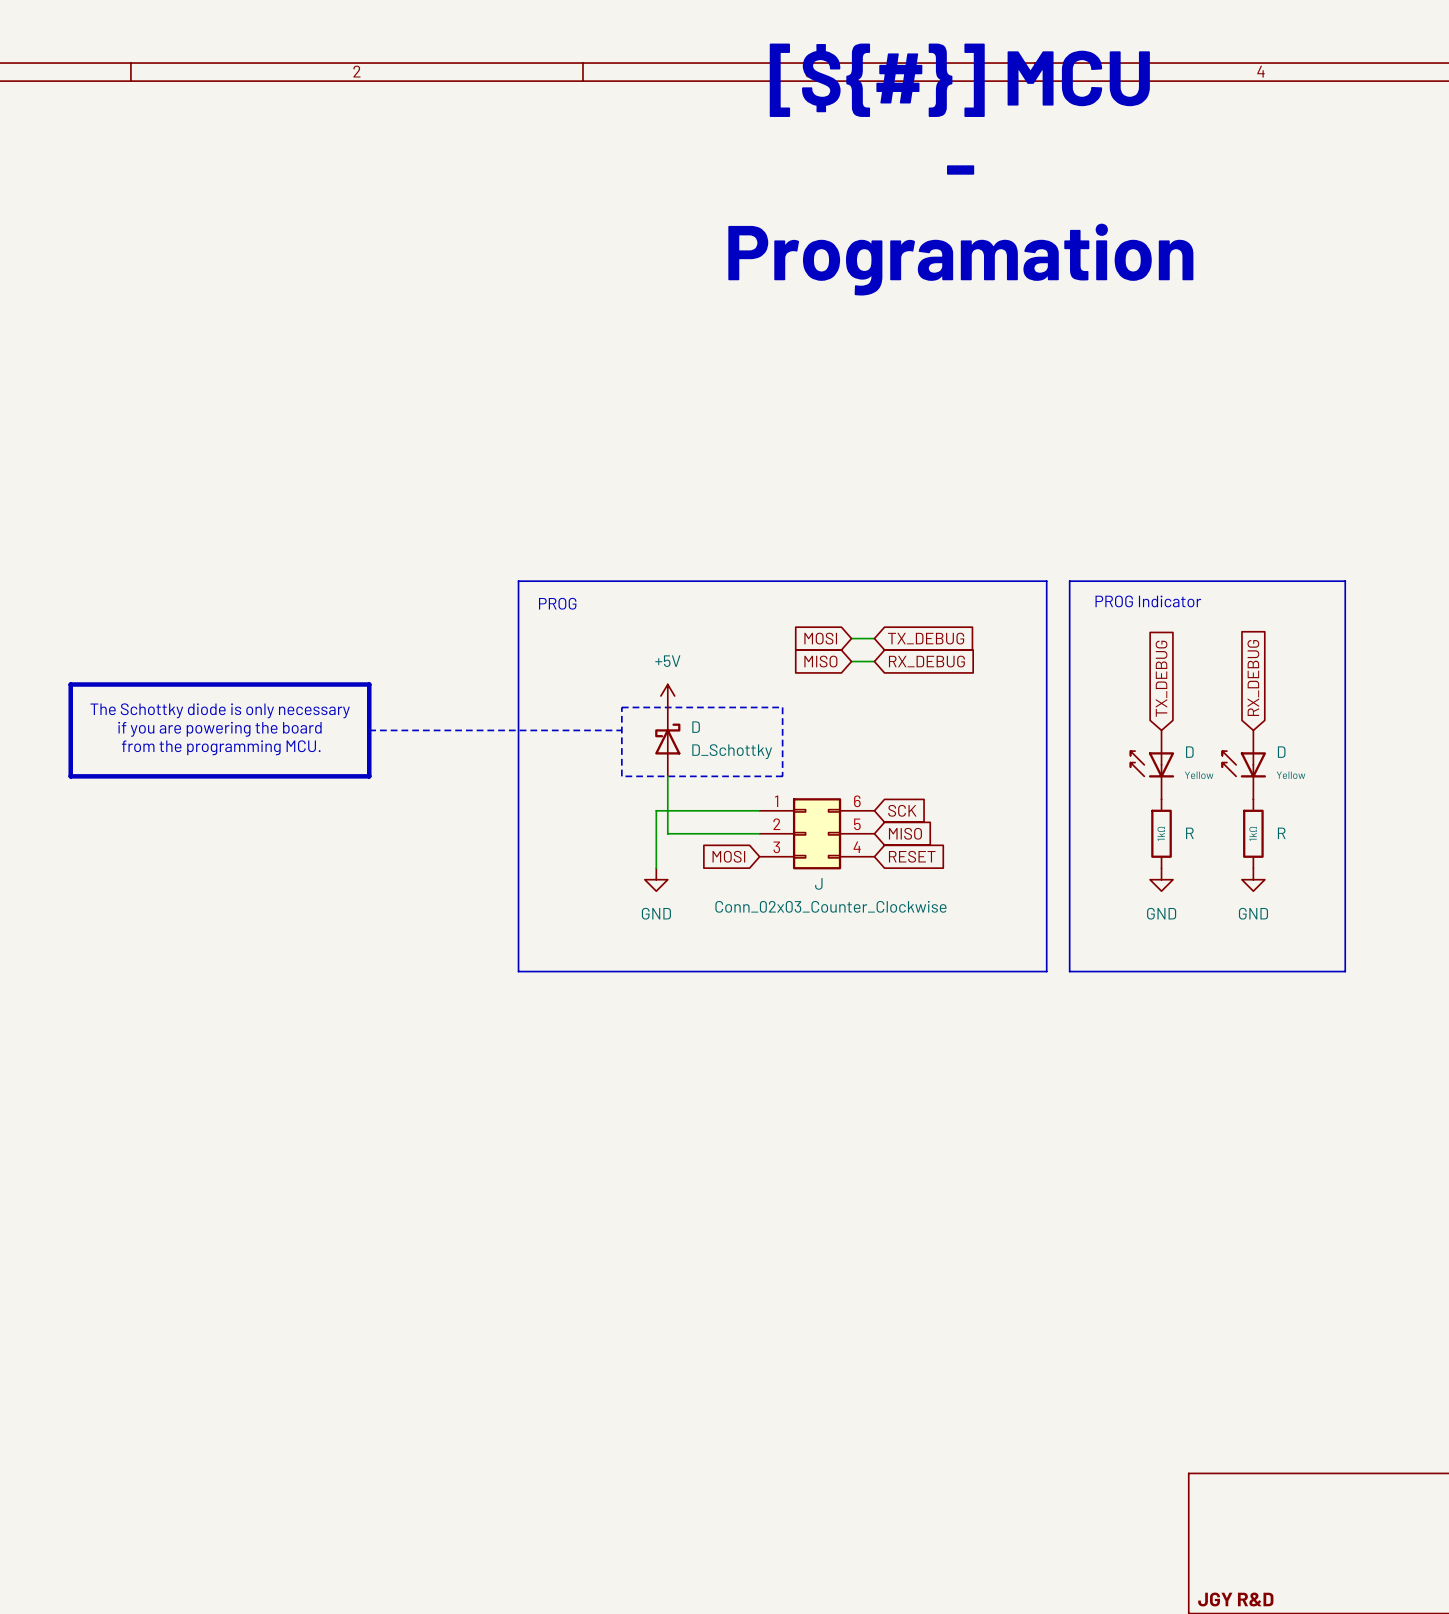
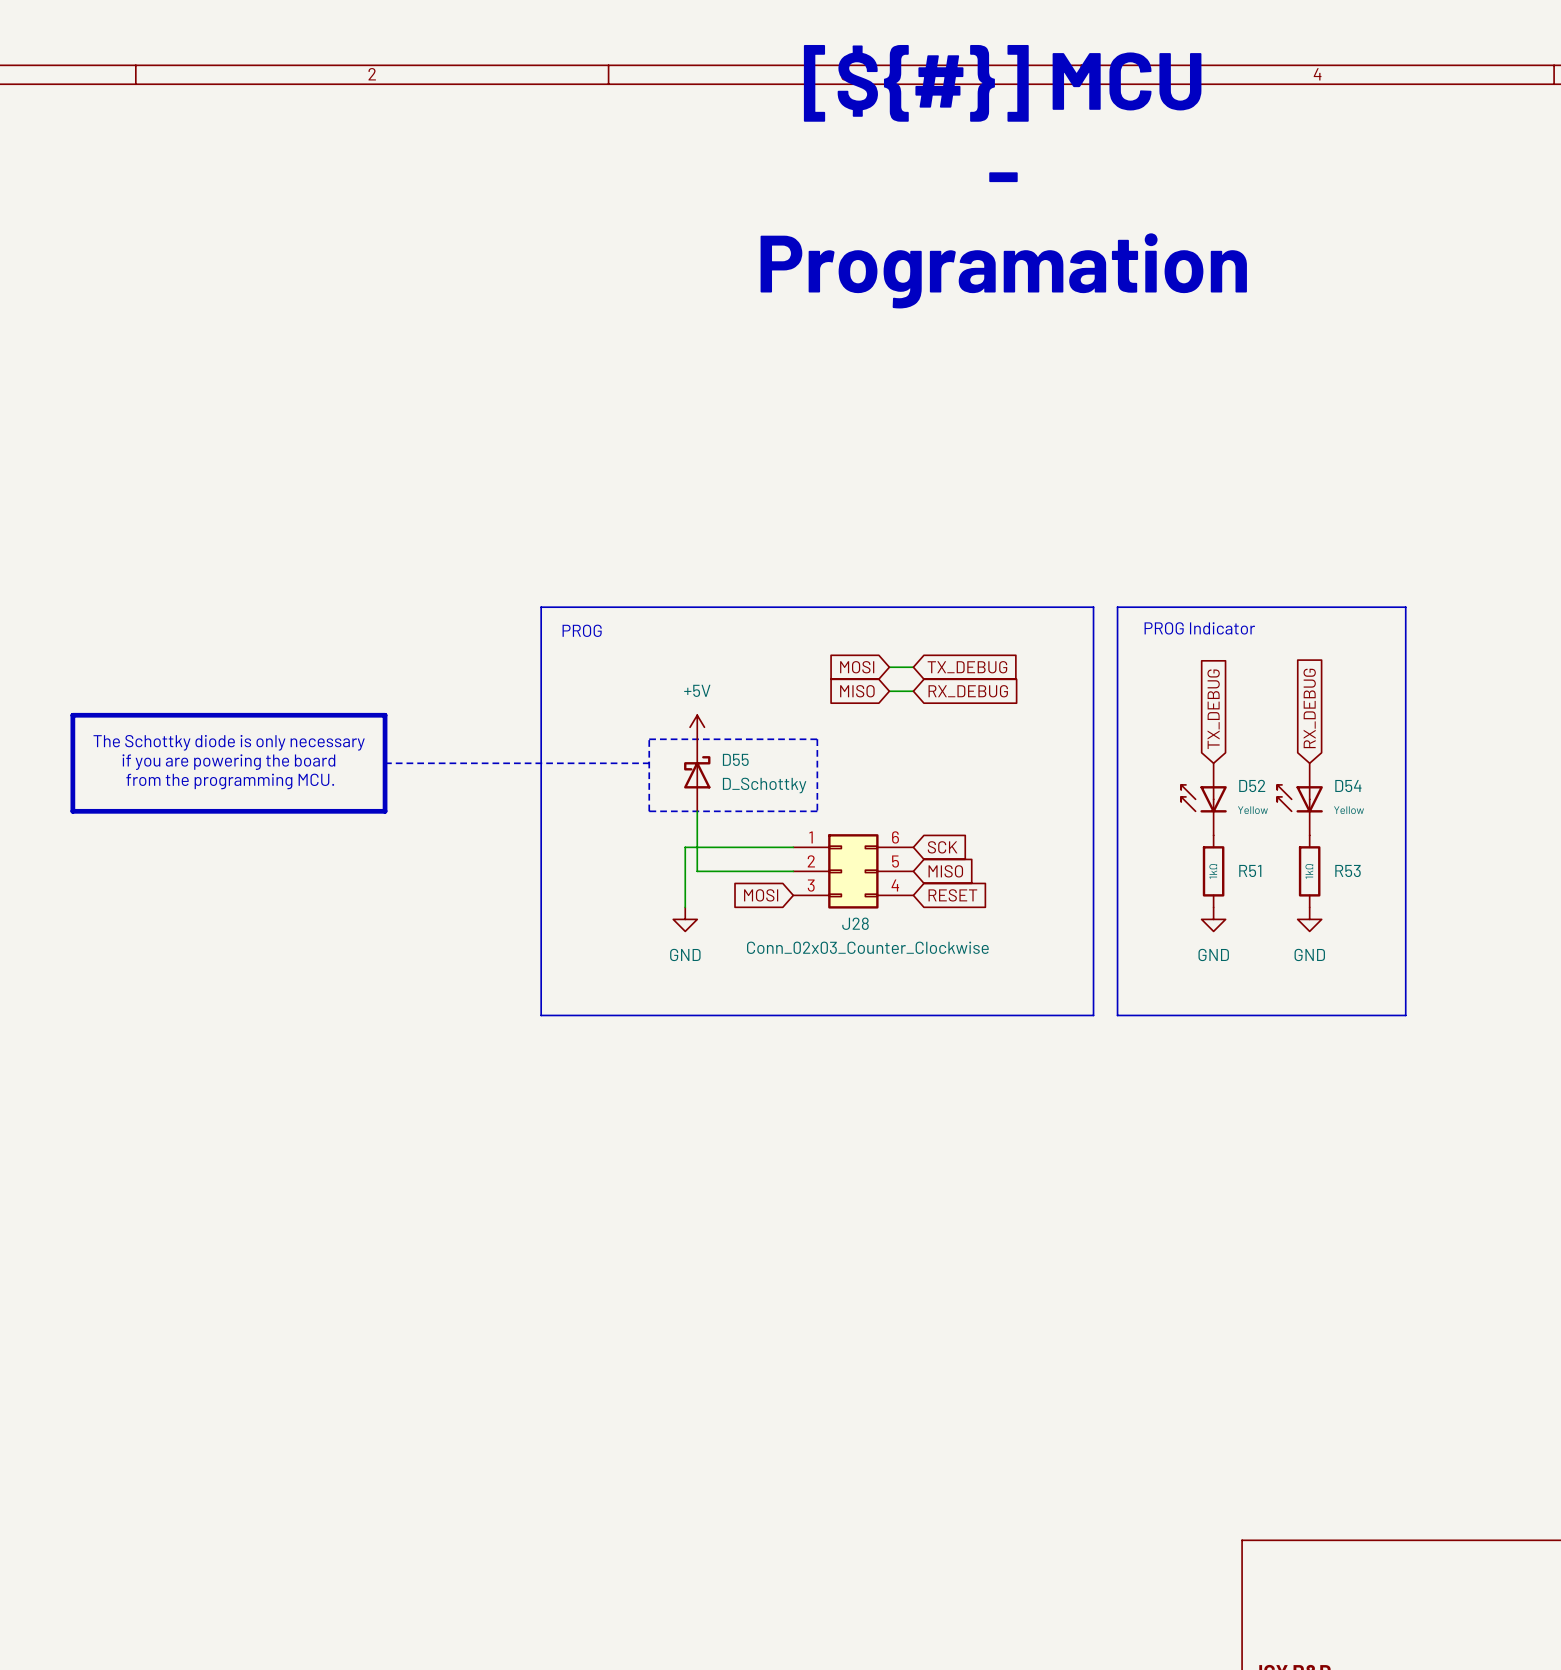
D name: D (696, 727) -> D55 (735, 759)
D name: D (1189, 752) -> D52 (1252, 785)
D name: D (1281, 752) -> D54 (1348, 786)
R name: R (1189, 833) -> R51 (1250, 870)
R name: R (1281, 833) -> R53 (1348, 870)
J name: J (818, 883) -> J28 (855, 923)

